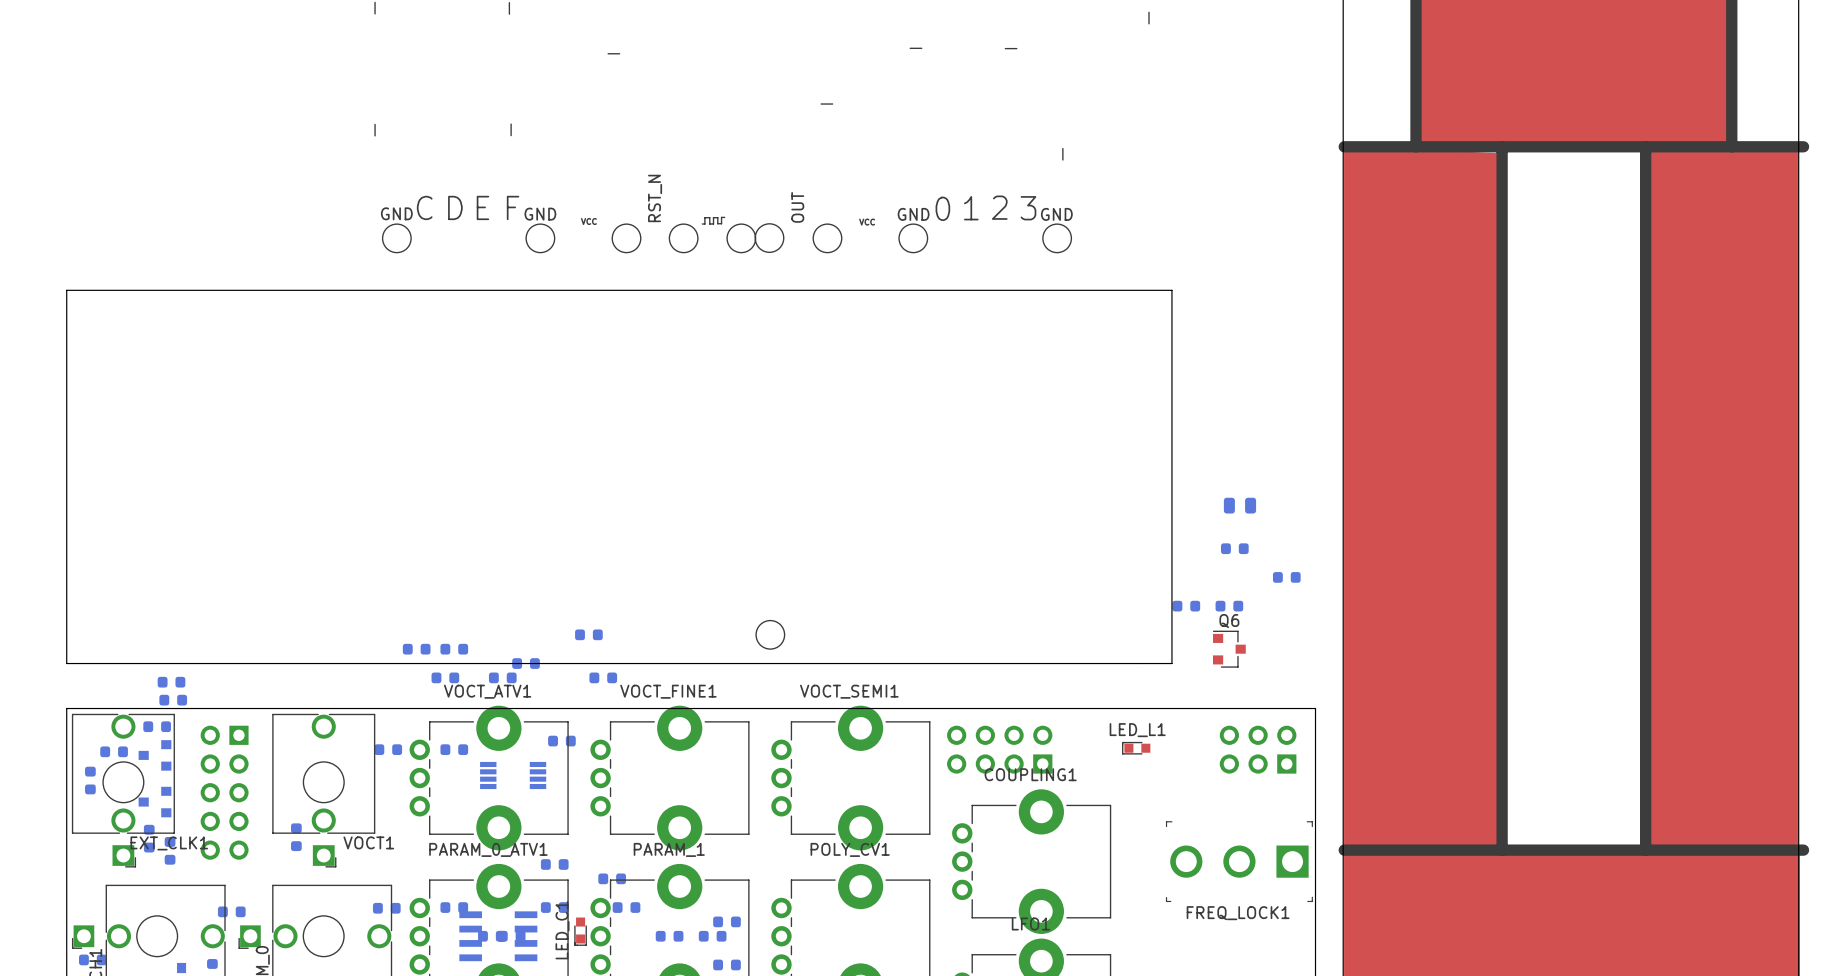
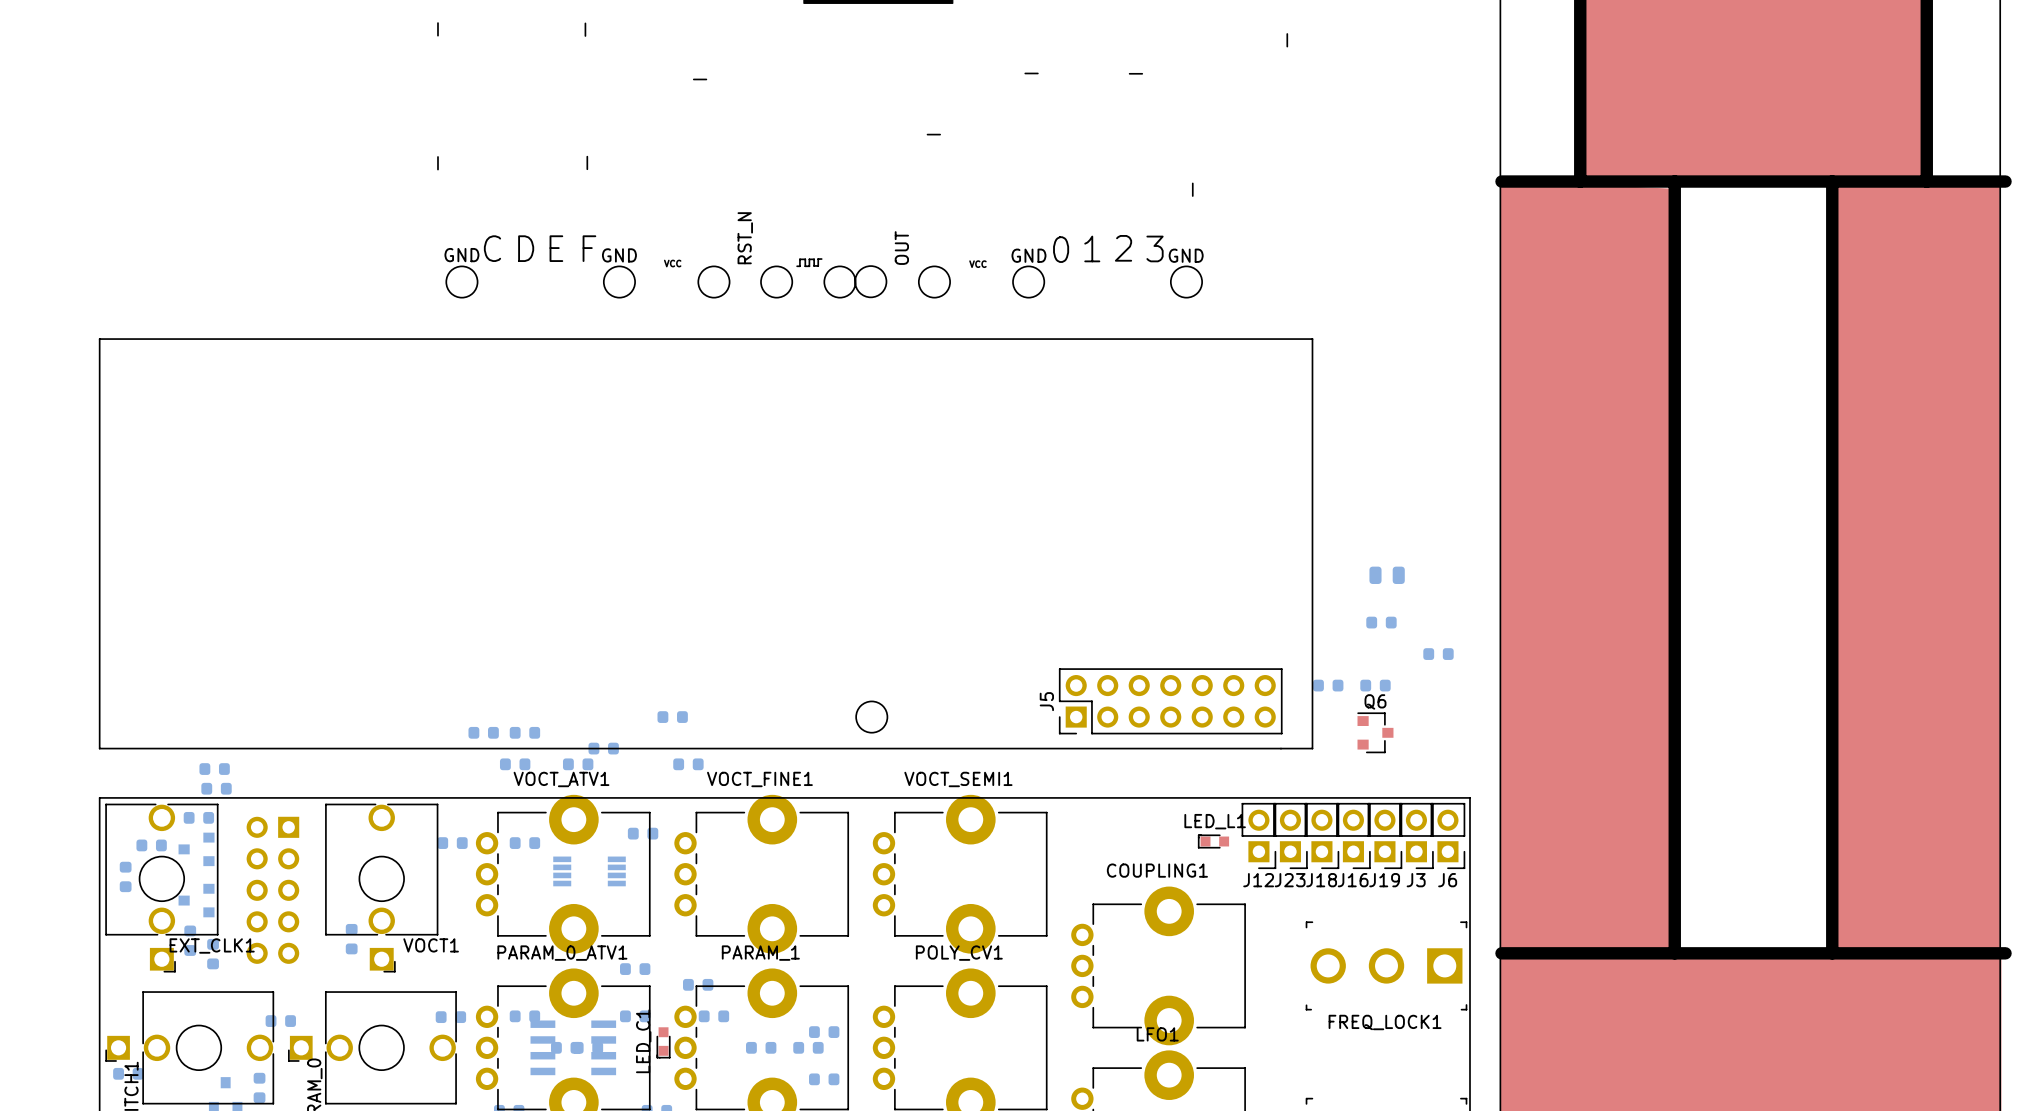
J5: none -> (1170, 701)
J12: none -> (1258, 835)
J23: none -> (1290, 835)
J18: none -> (1321, 835)
J16: none -> (1353, 835)
J19: none -> (1384, 835)
J3: none -> (1416, 835)
J6: none -> (1447, 835)
LED_L1 position: (1136, 748) -> (1213, 841)
part: (999, 749) -> none
part: (1258, 749) -> none

